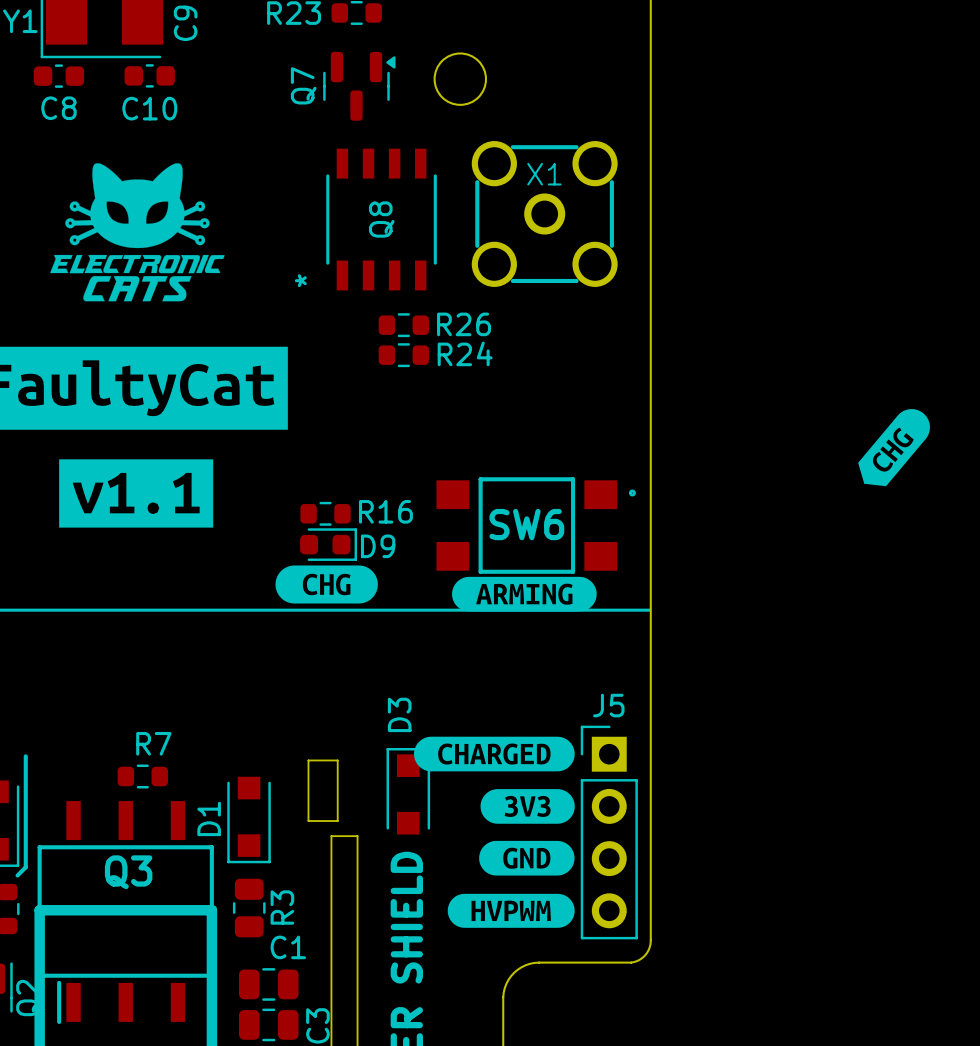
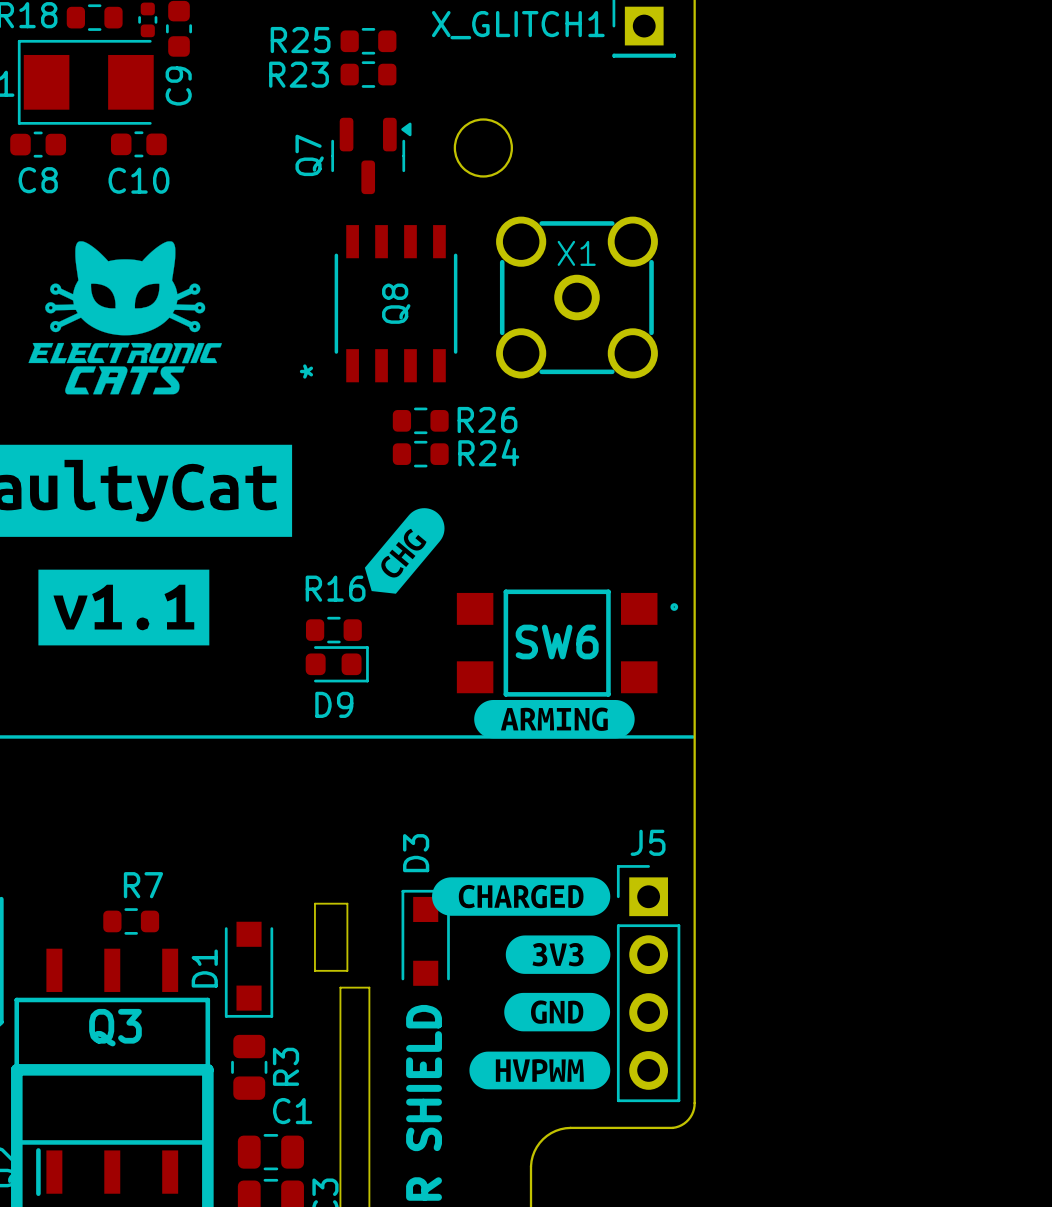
drawing position: (894, 447) -> (404, 550)
R16 name position: R16 (385, 511) -> R16 (335, 588)
D9 name position: D9 (378, 546) -> D9 (334, 704)
drawing: [275, 565, 378, 604] -> none

